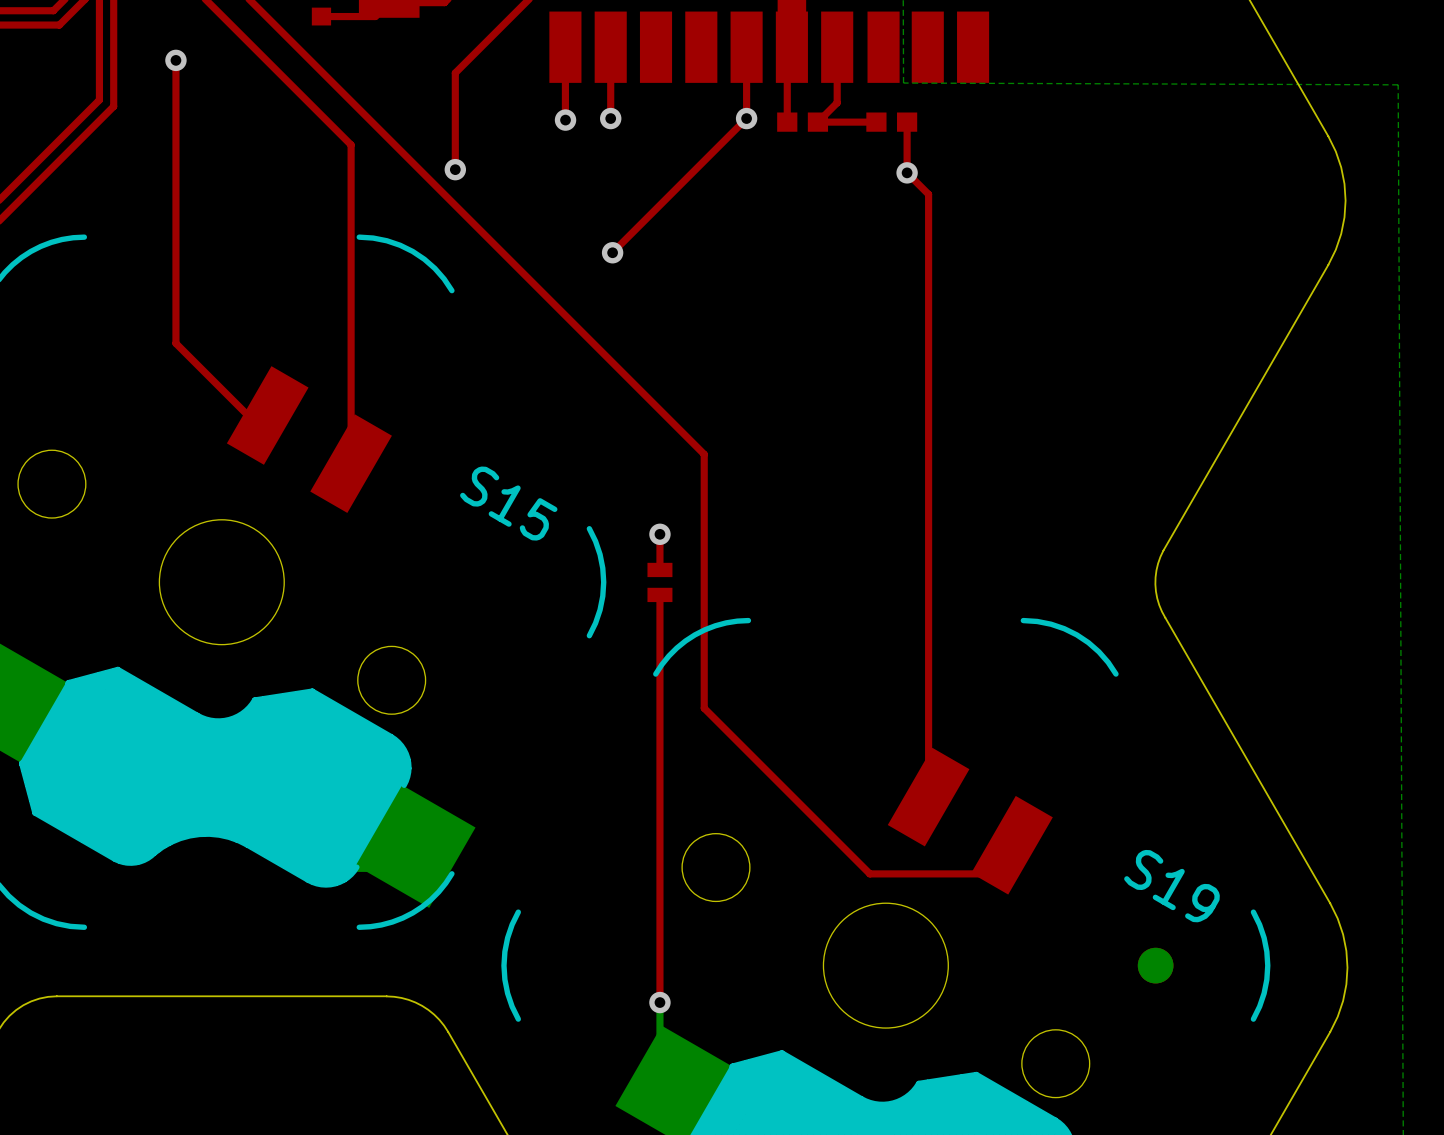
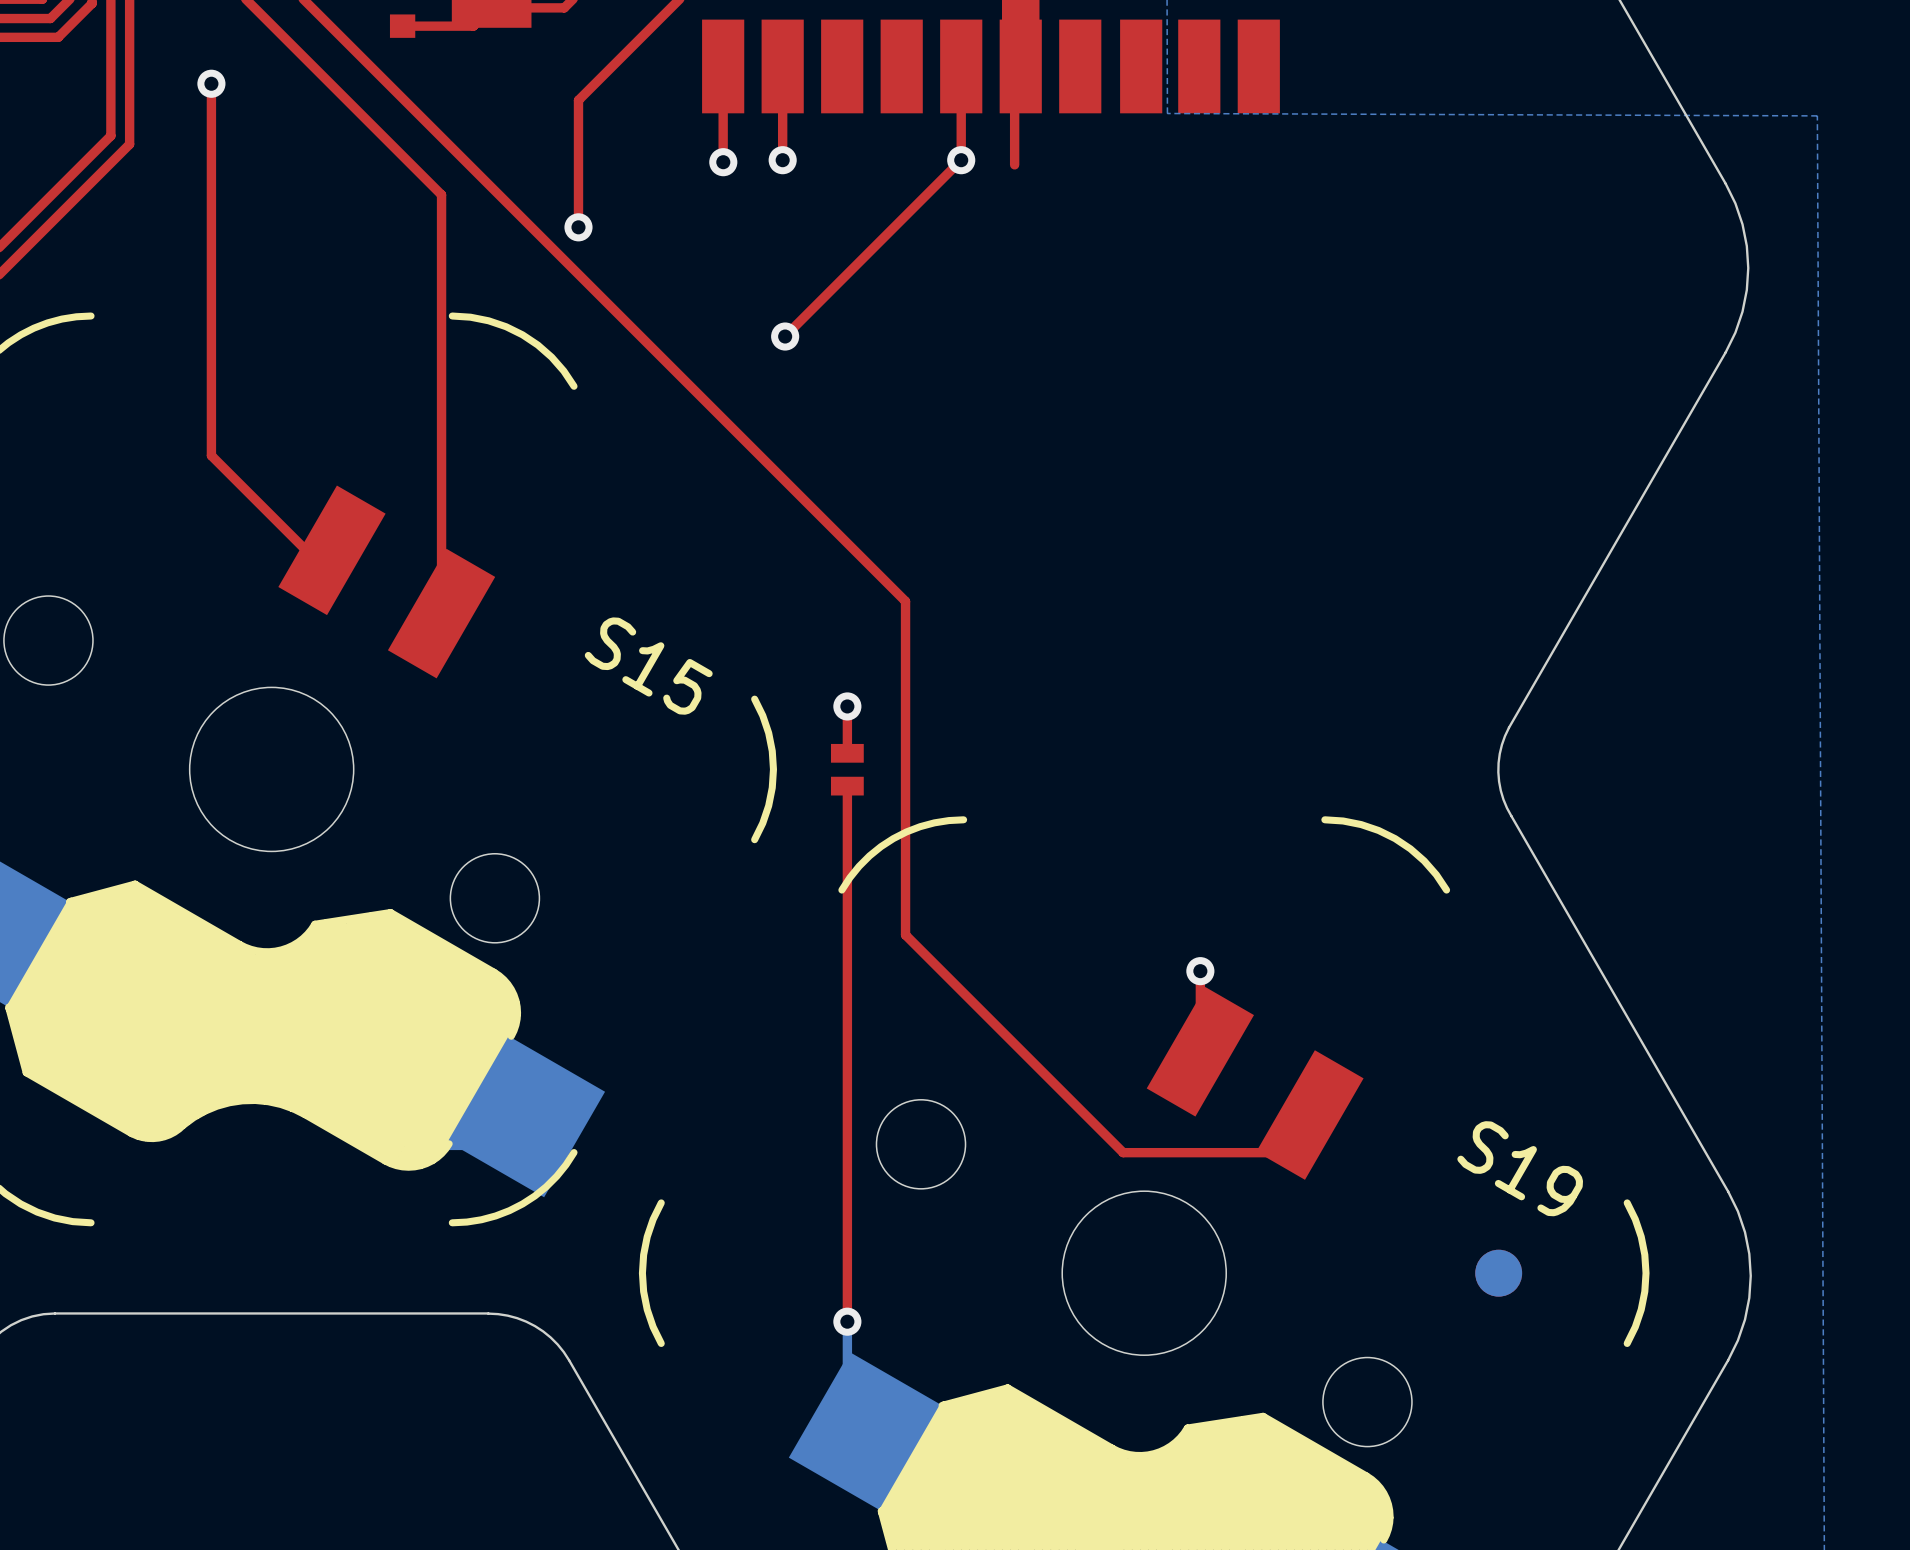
top track: (837, 47) (837, 102) (817, 122) (876, 122) -> none
part: (802, 122) -> none
part: (891, 122) -> none
top track: (907, 122) (907, 172) (928, 194) (928, 735) -> none
via: (907, 172) -> none
via: none -> (1200, 971)

